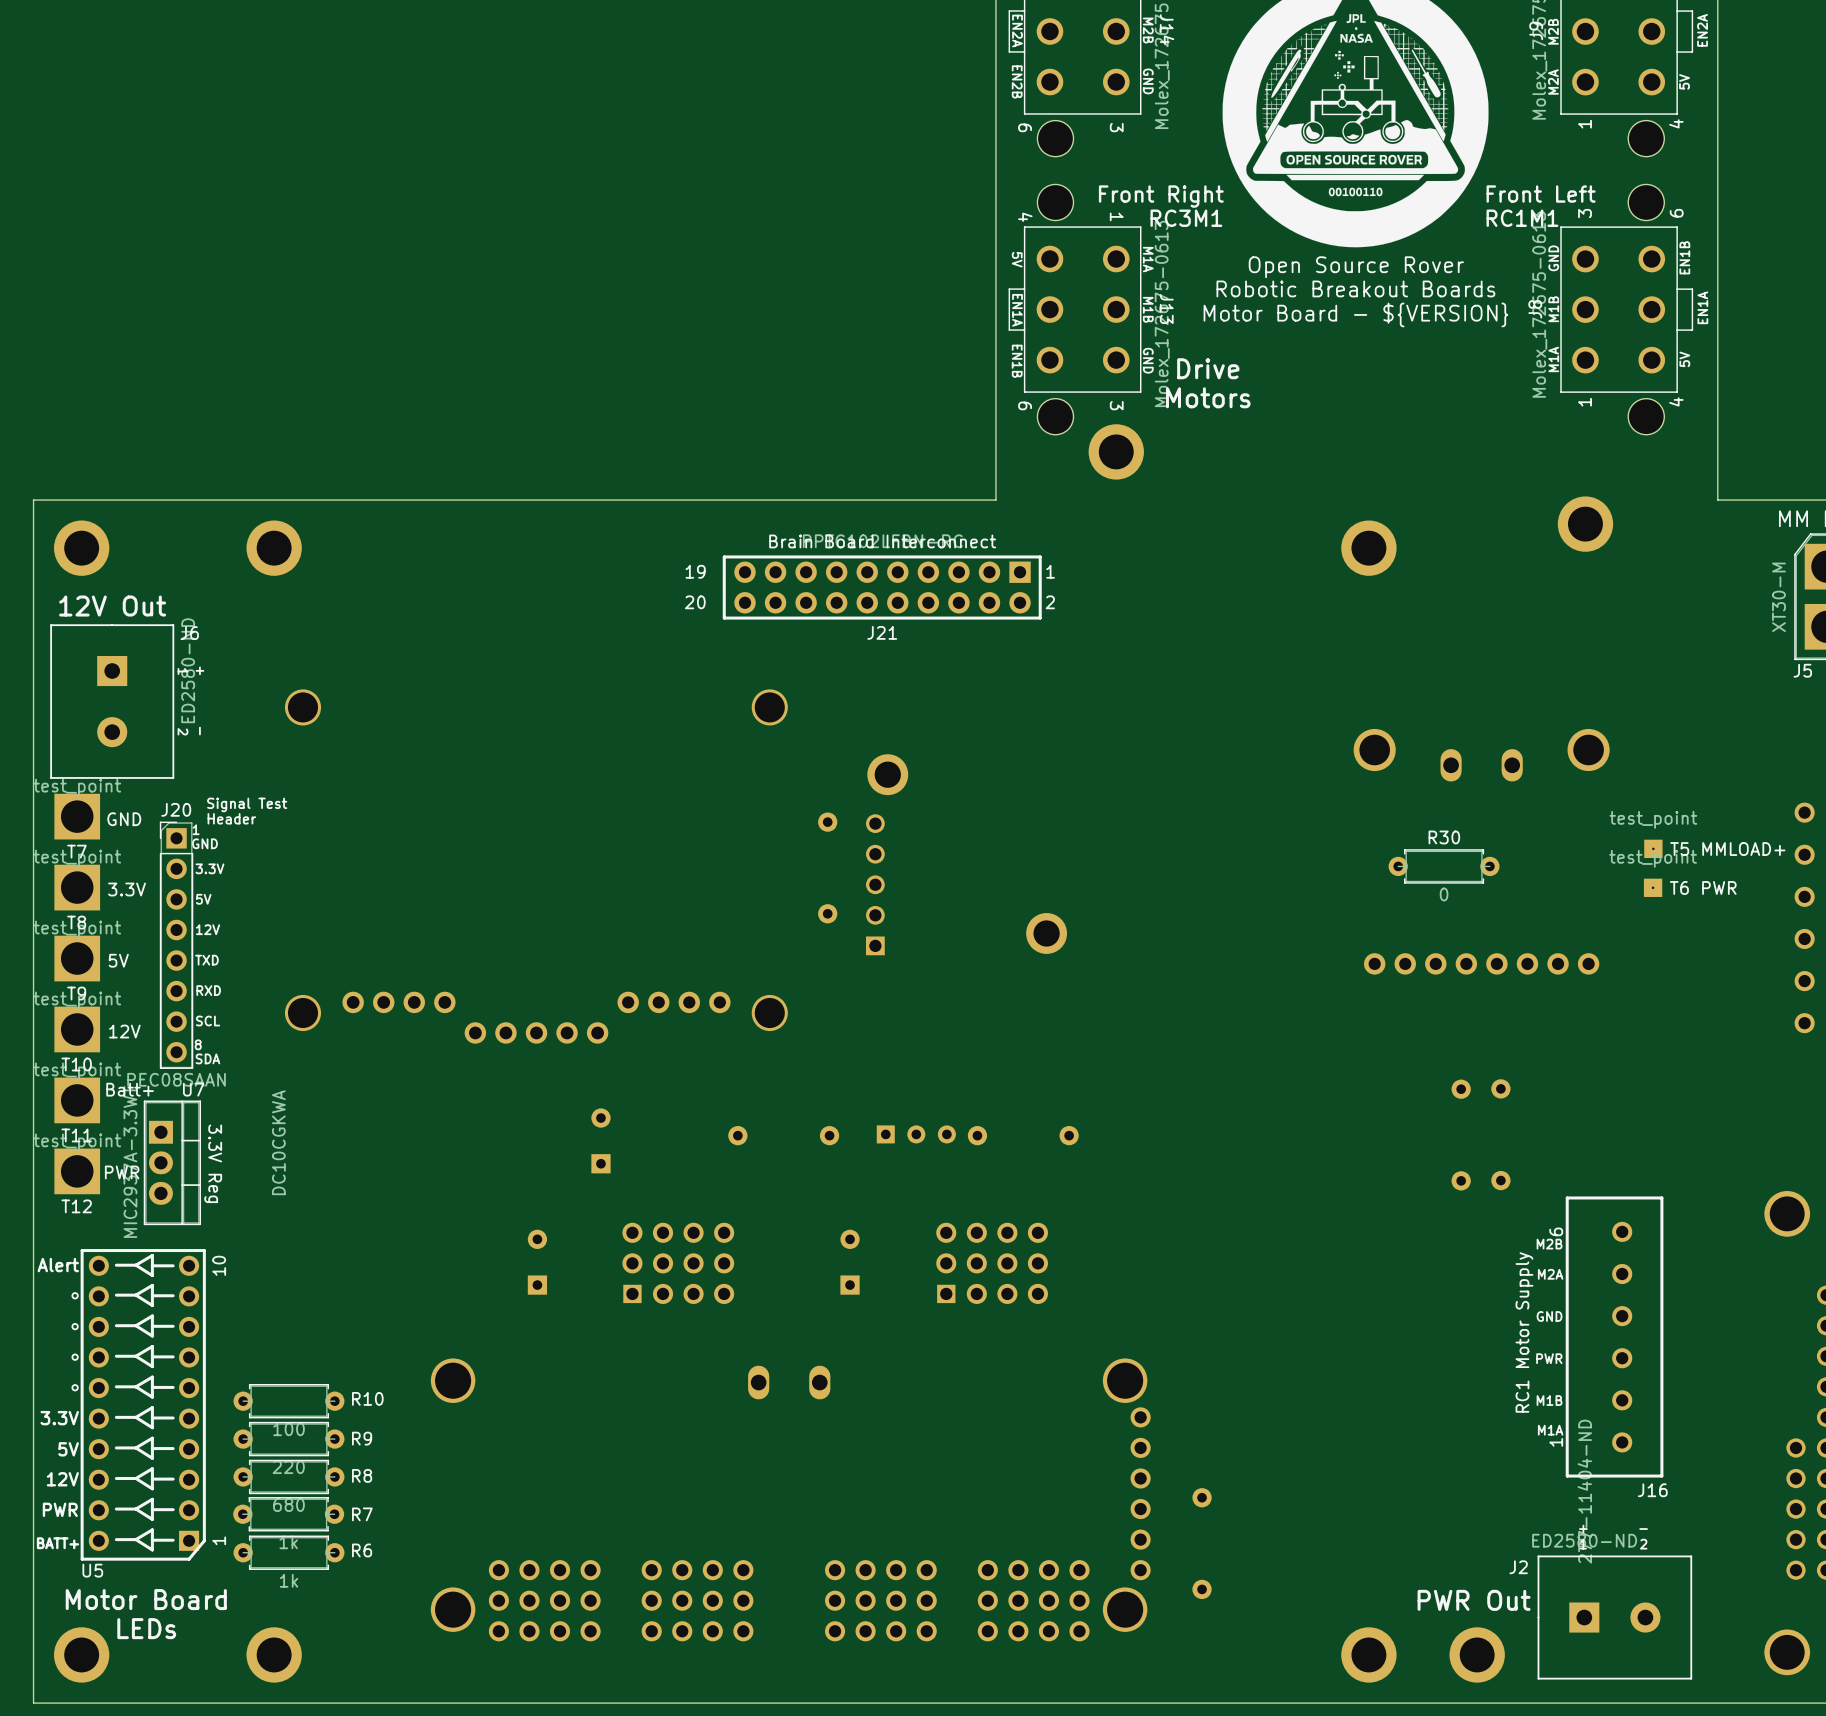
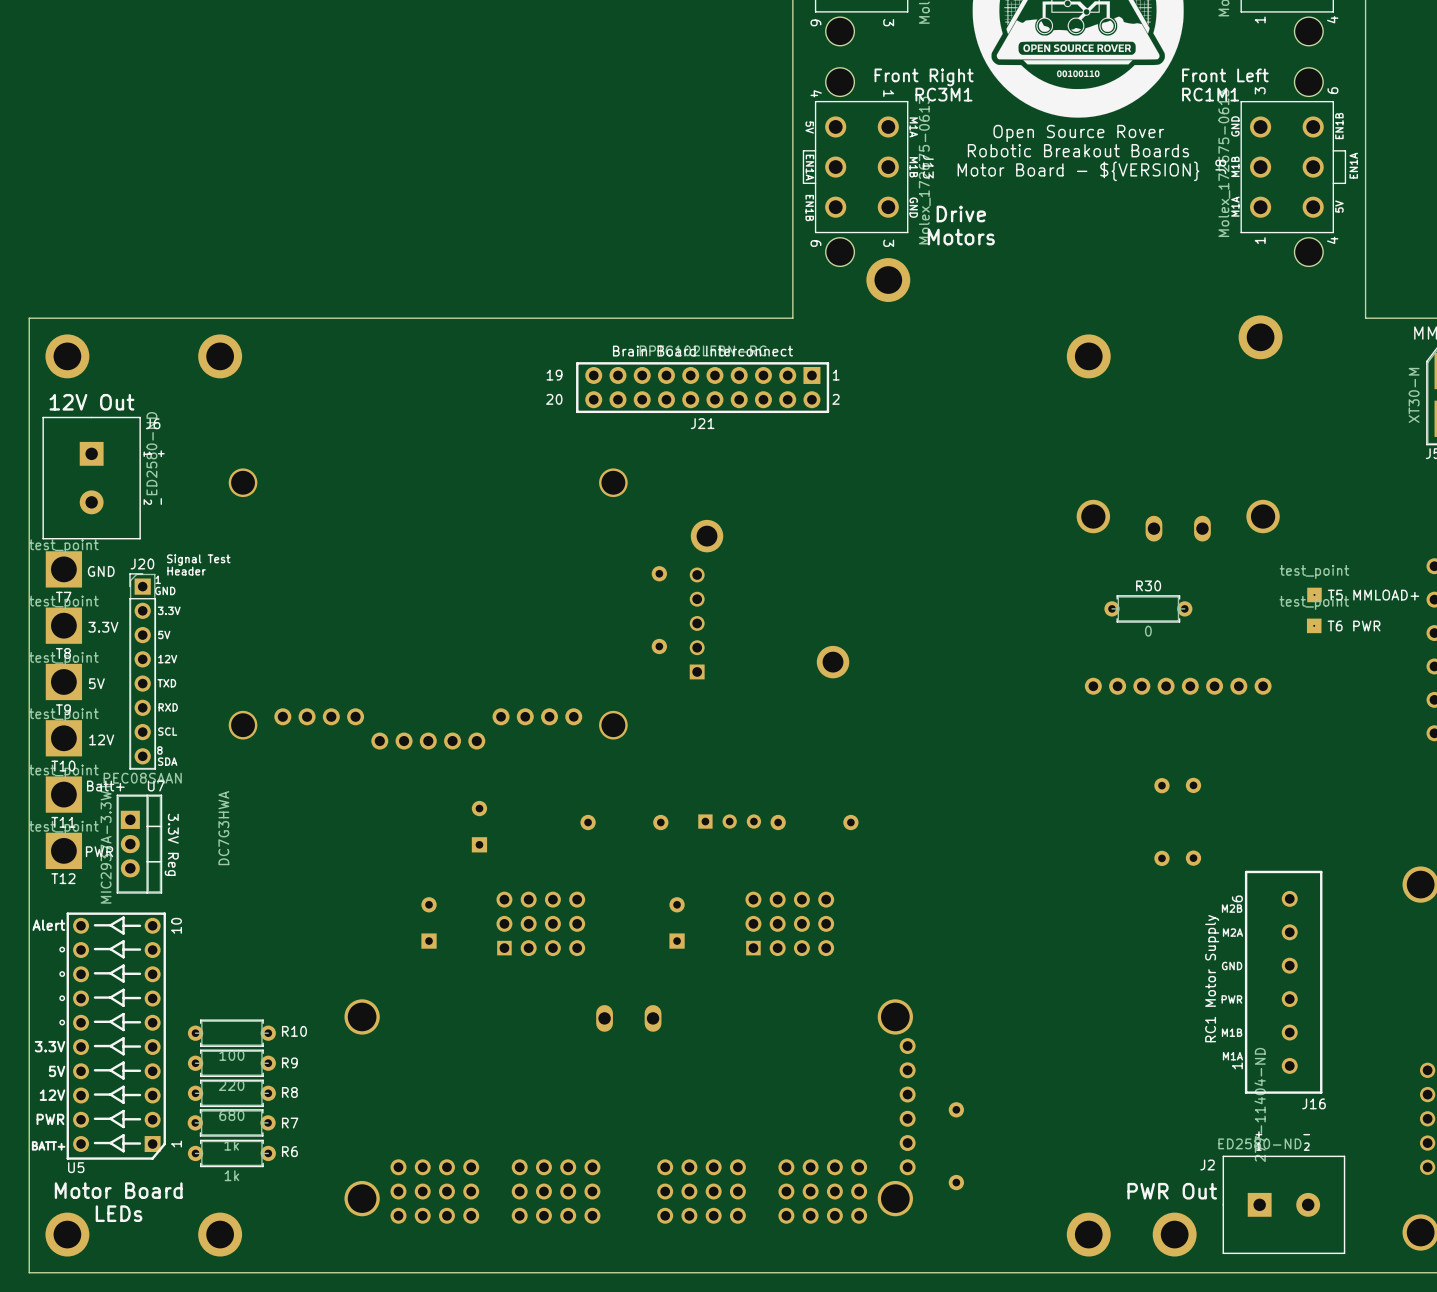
U5 value: DC10CGKWA (278, 1142) -> DC7G3HWA (223, 828)

